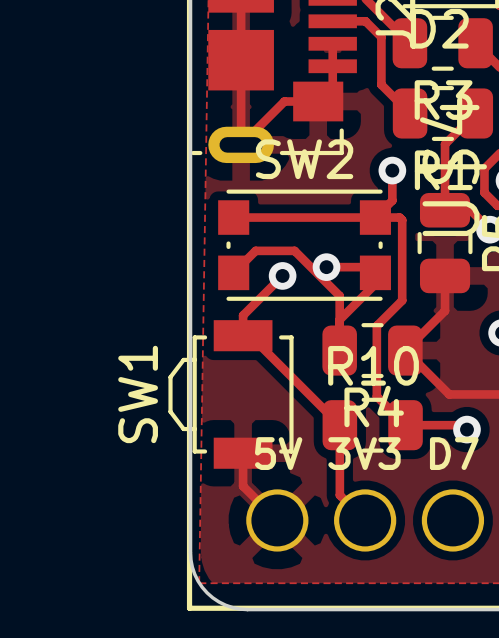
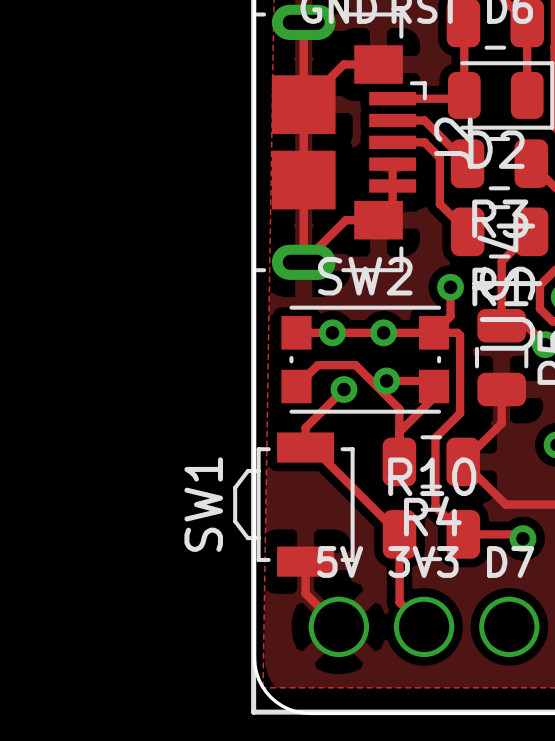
via: none -> (332, 332)
via: none -> (383, 332)

